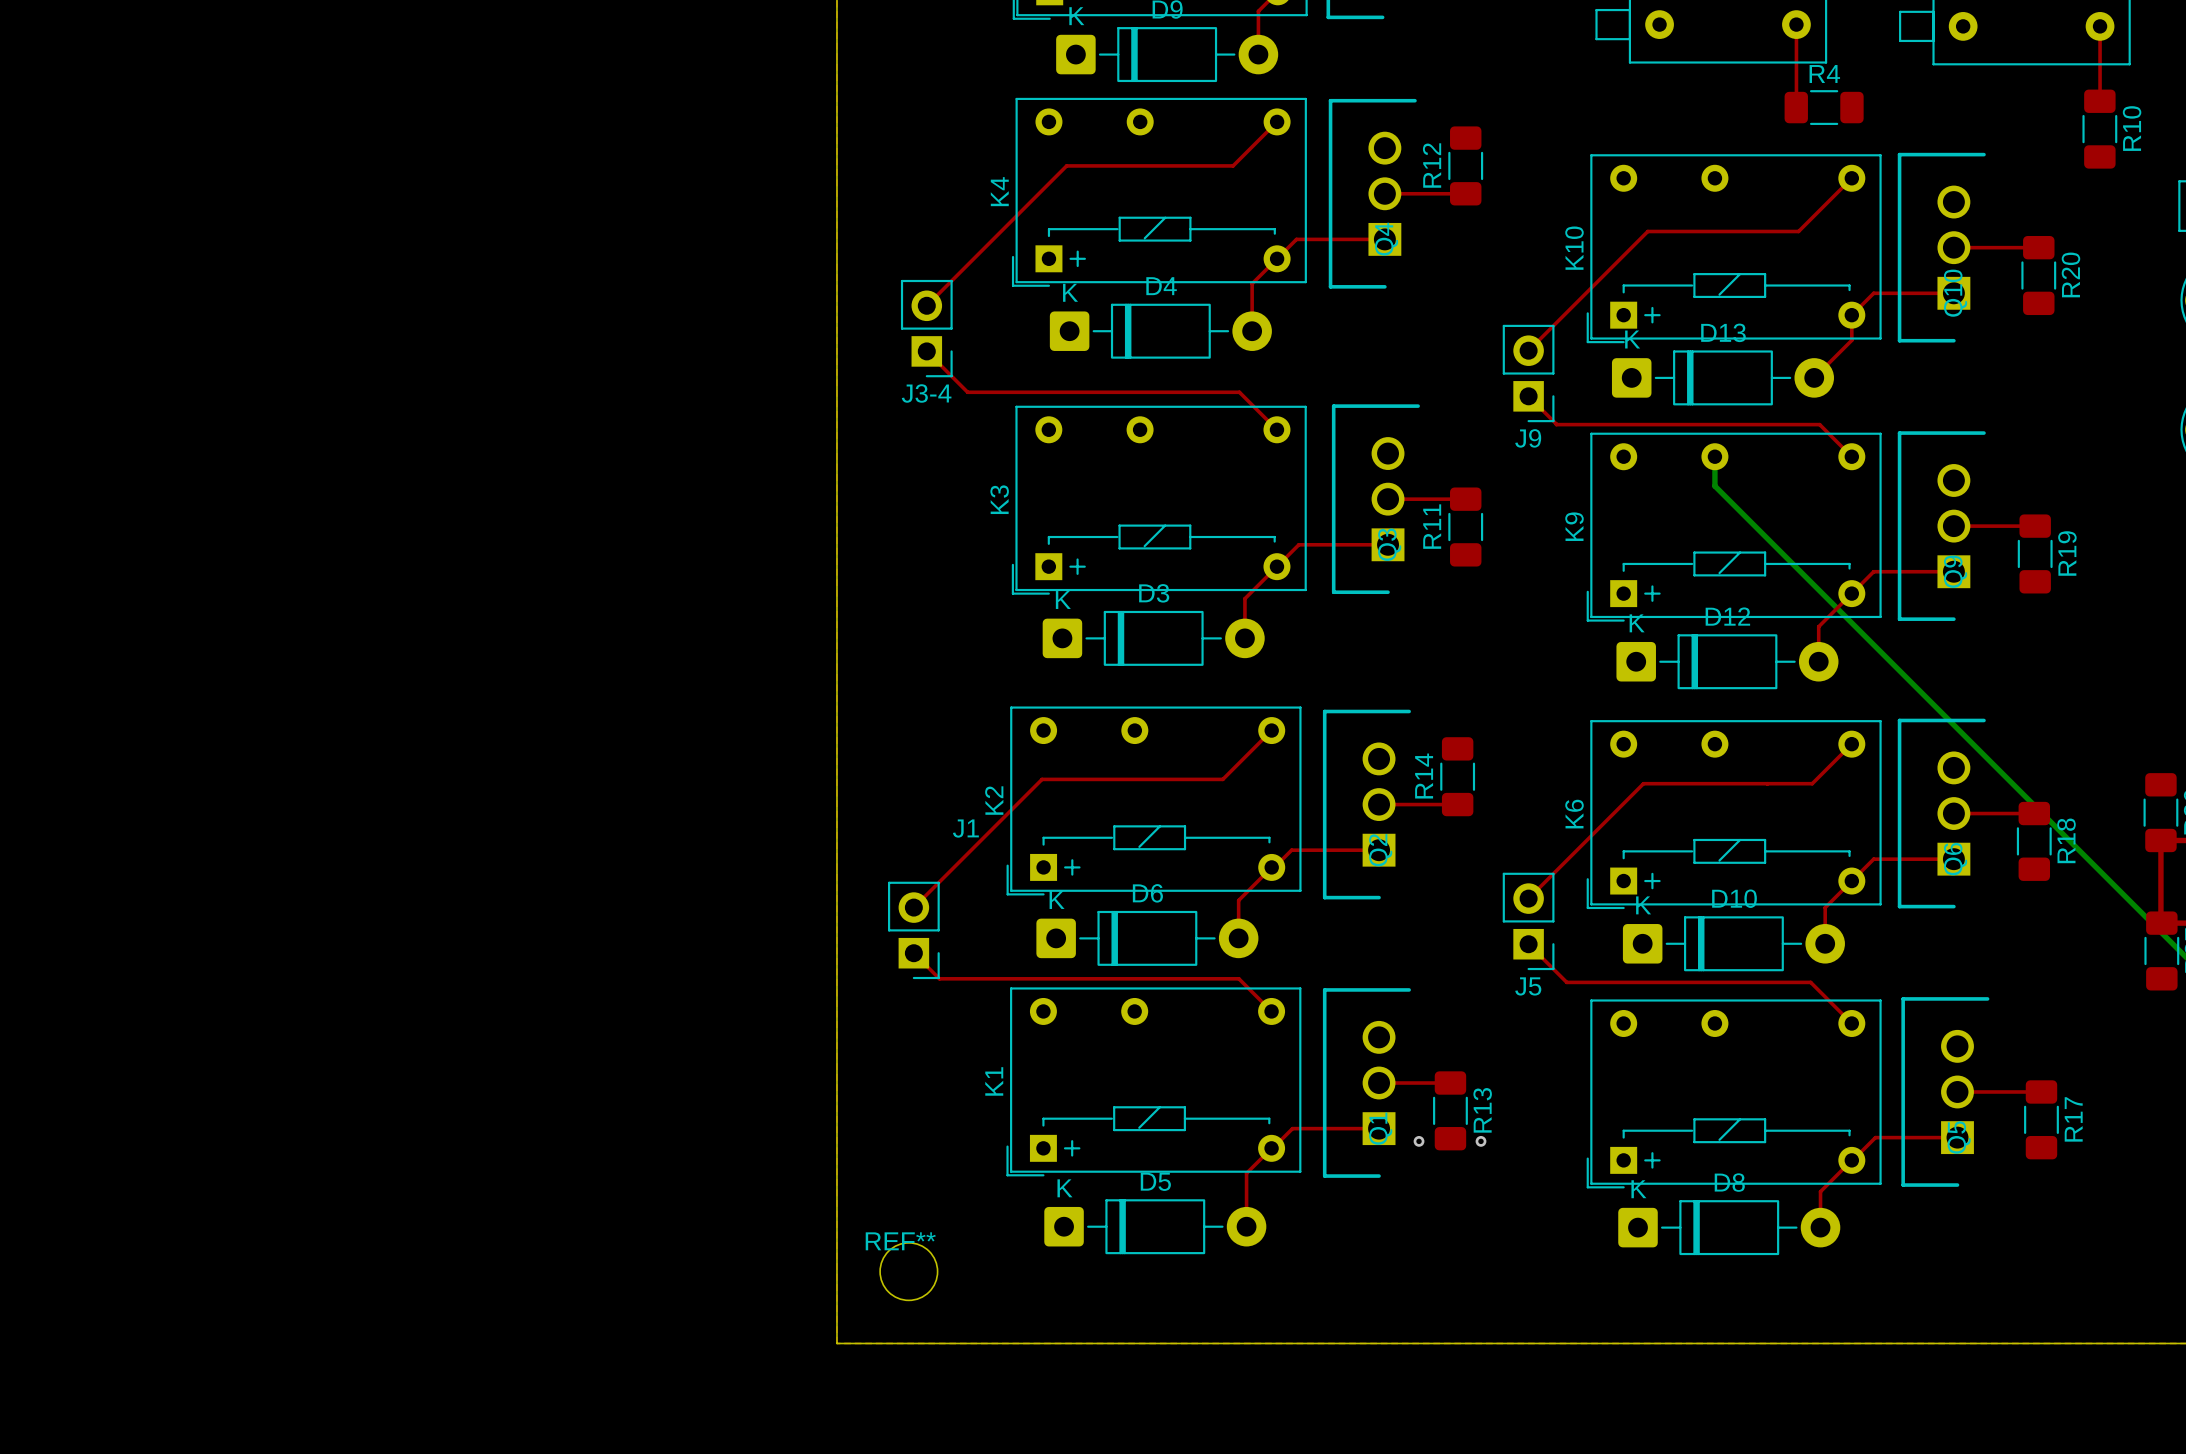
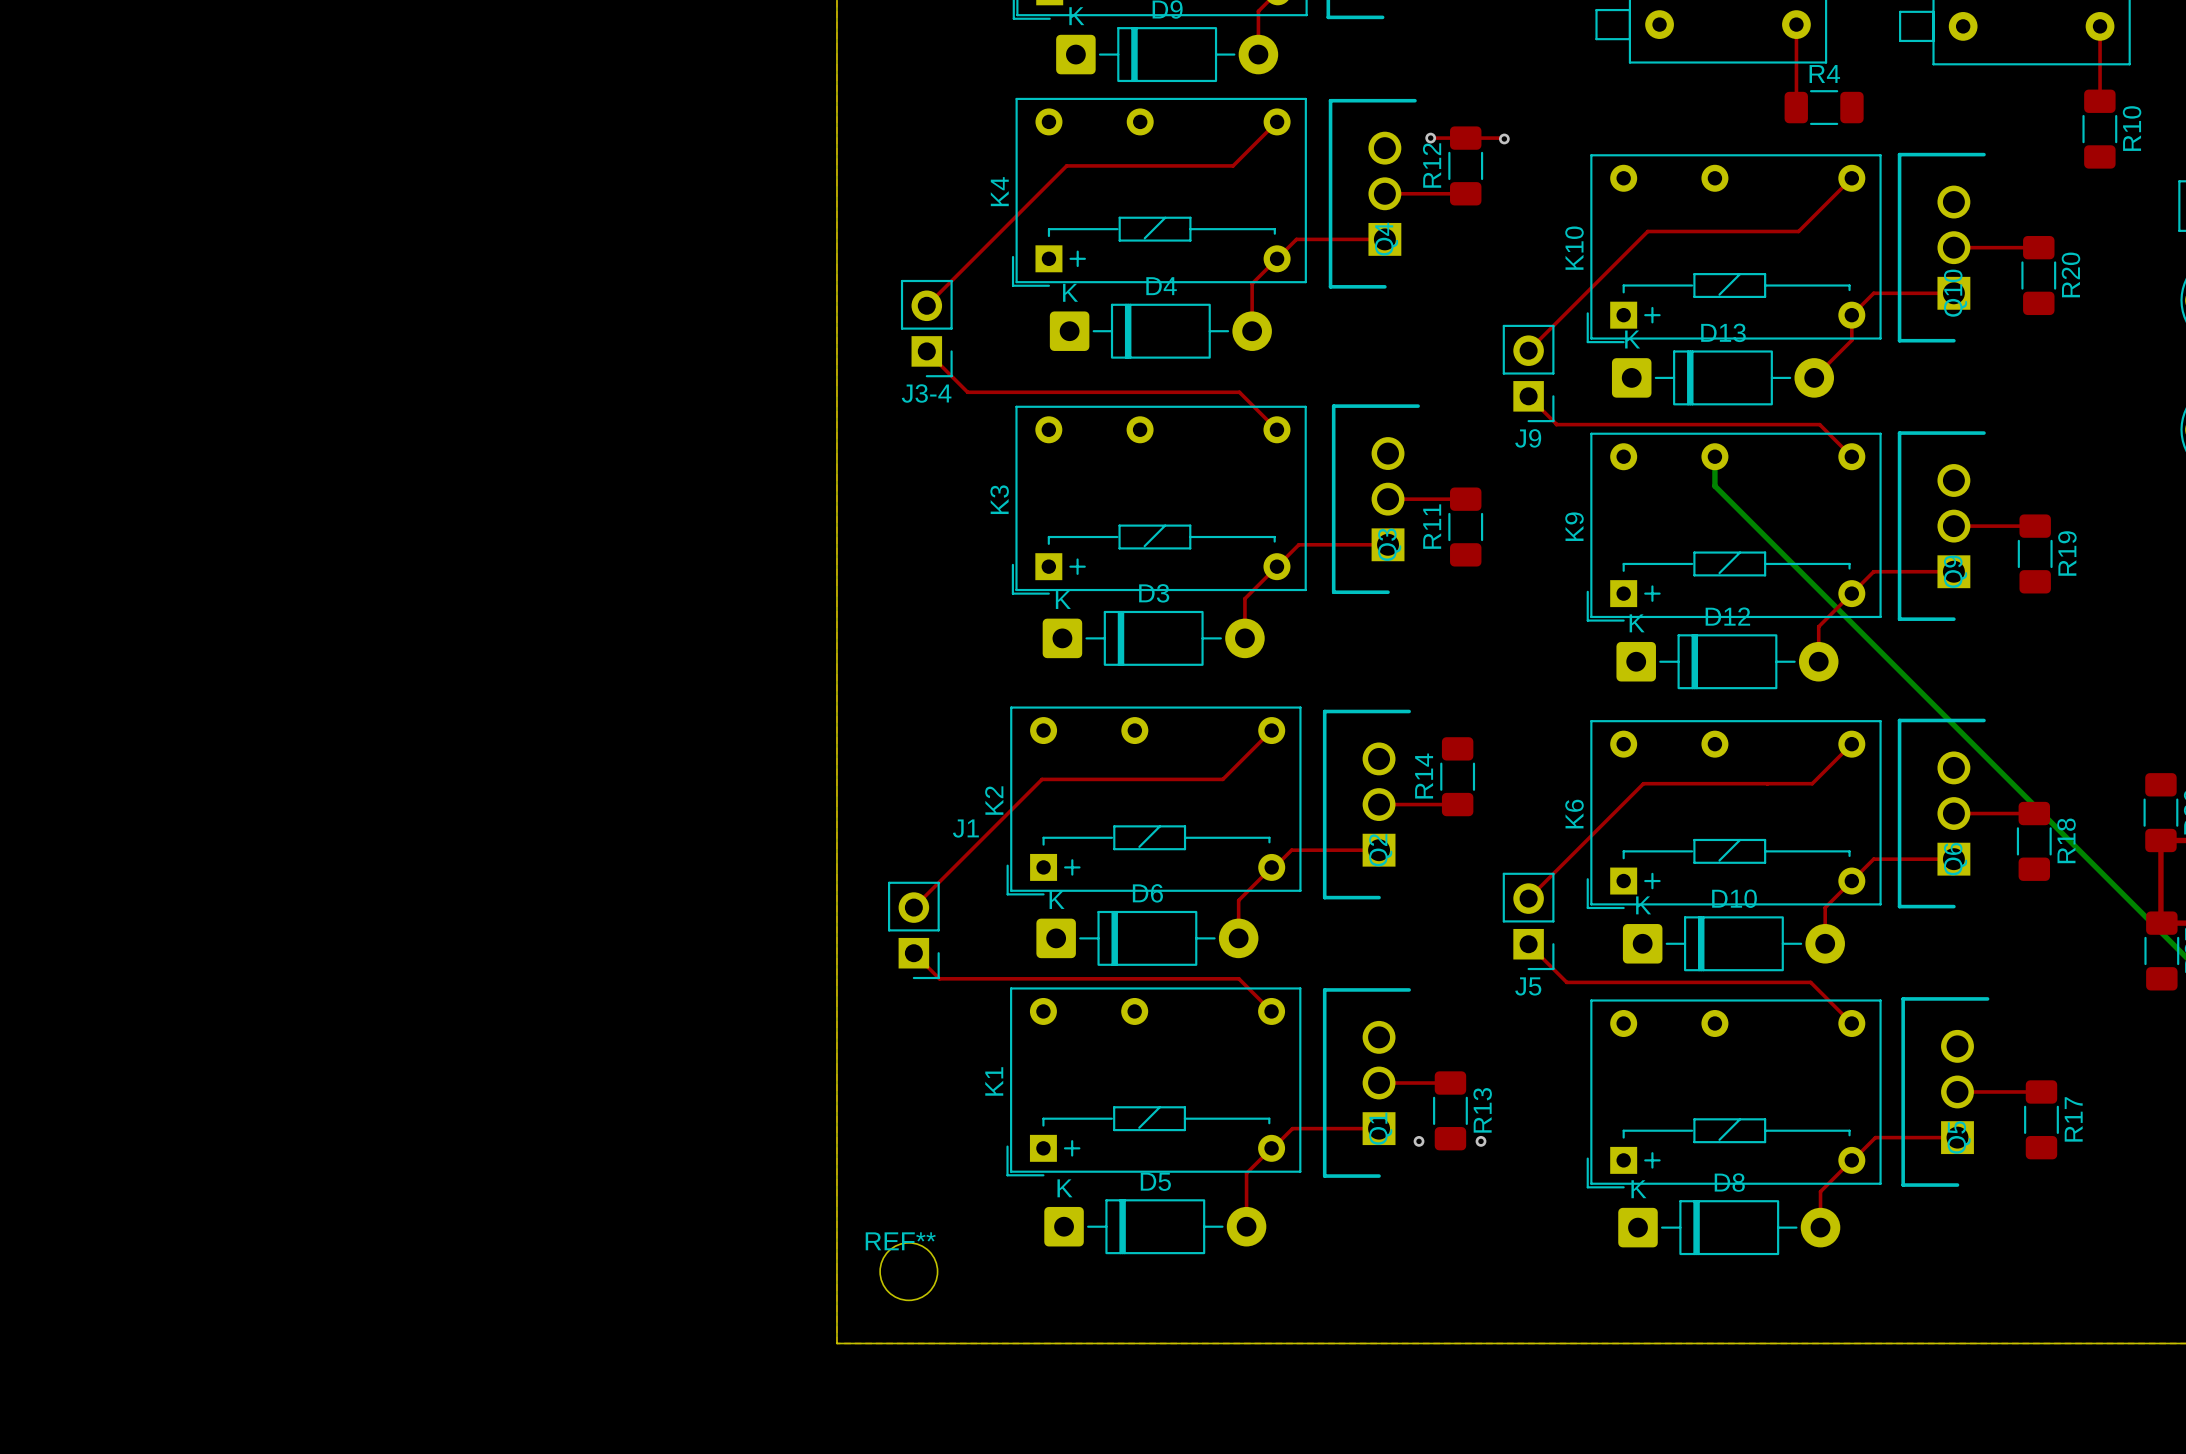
top track: none -> (1430, 138) (1504, 138)
via: none -> (1430, 138)
via: none -> (1504, 138)

